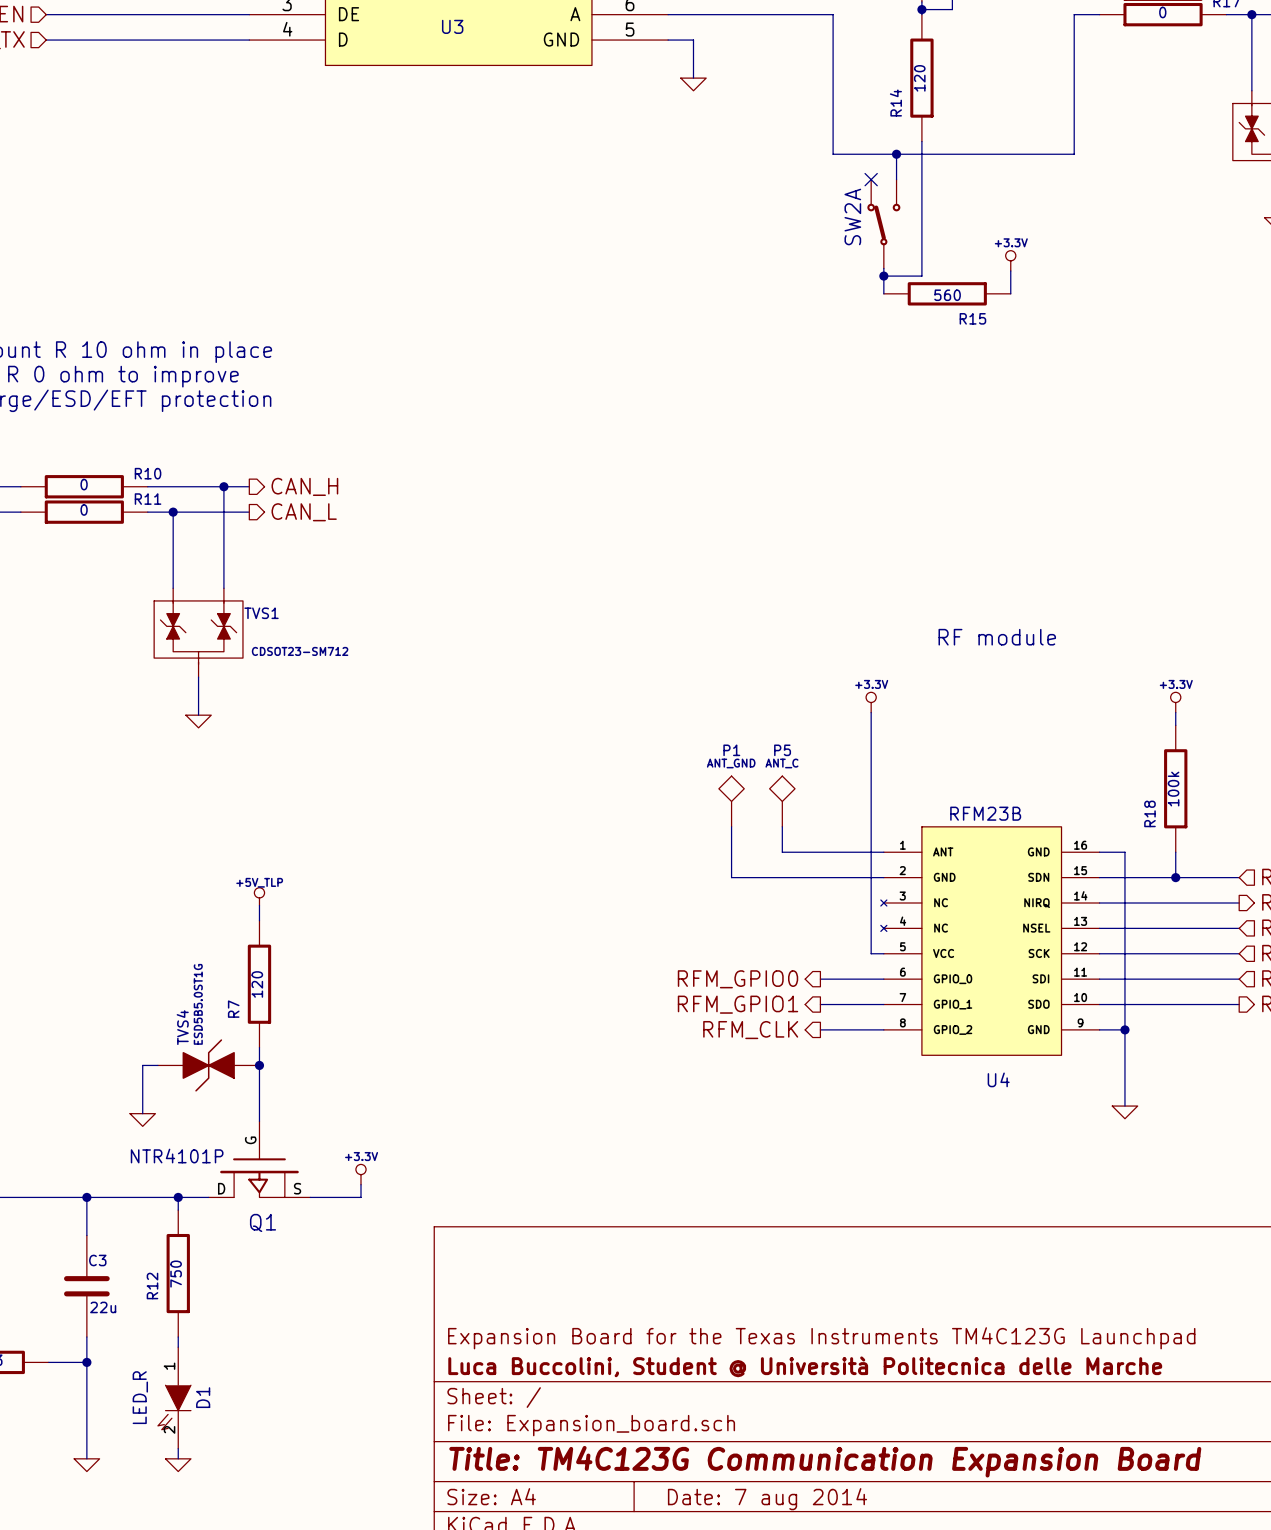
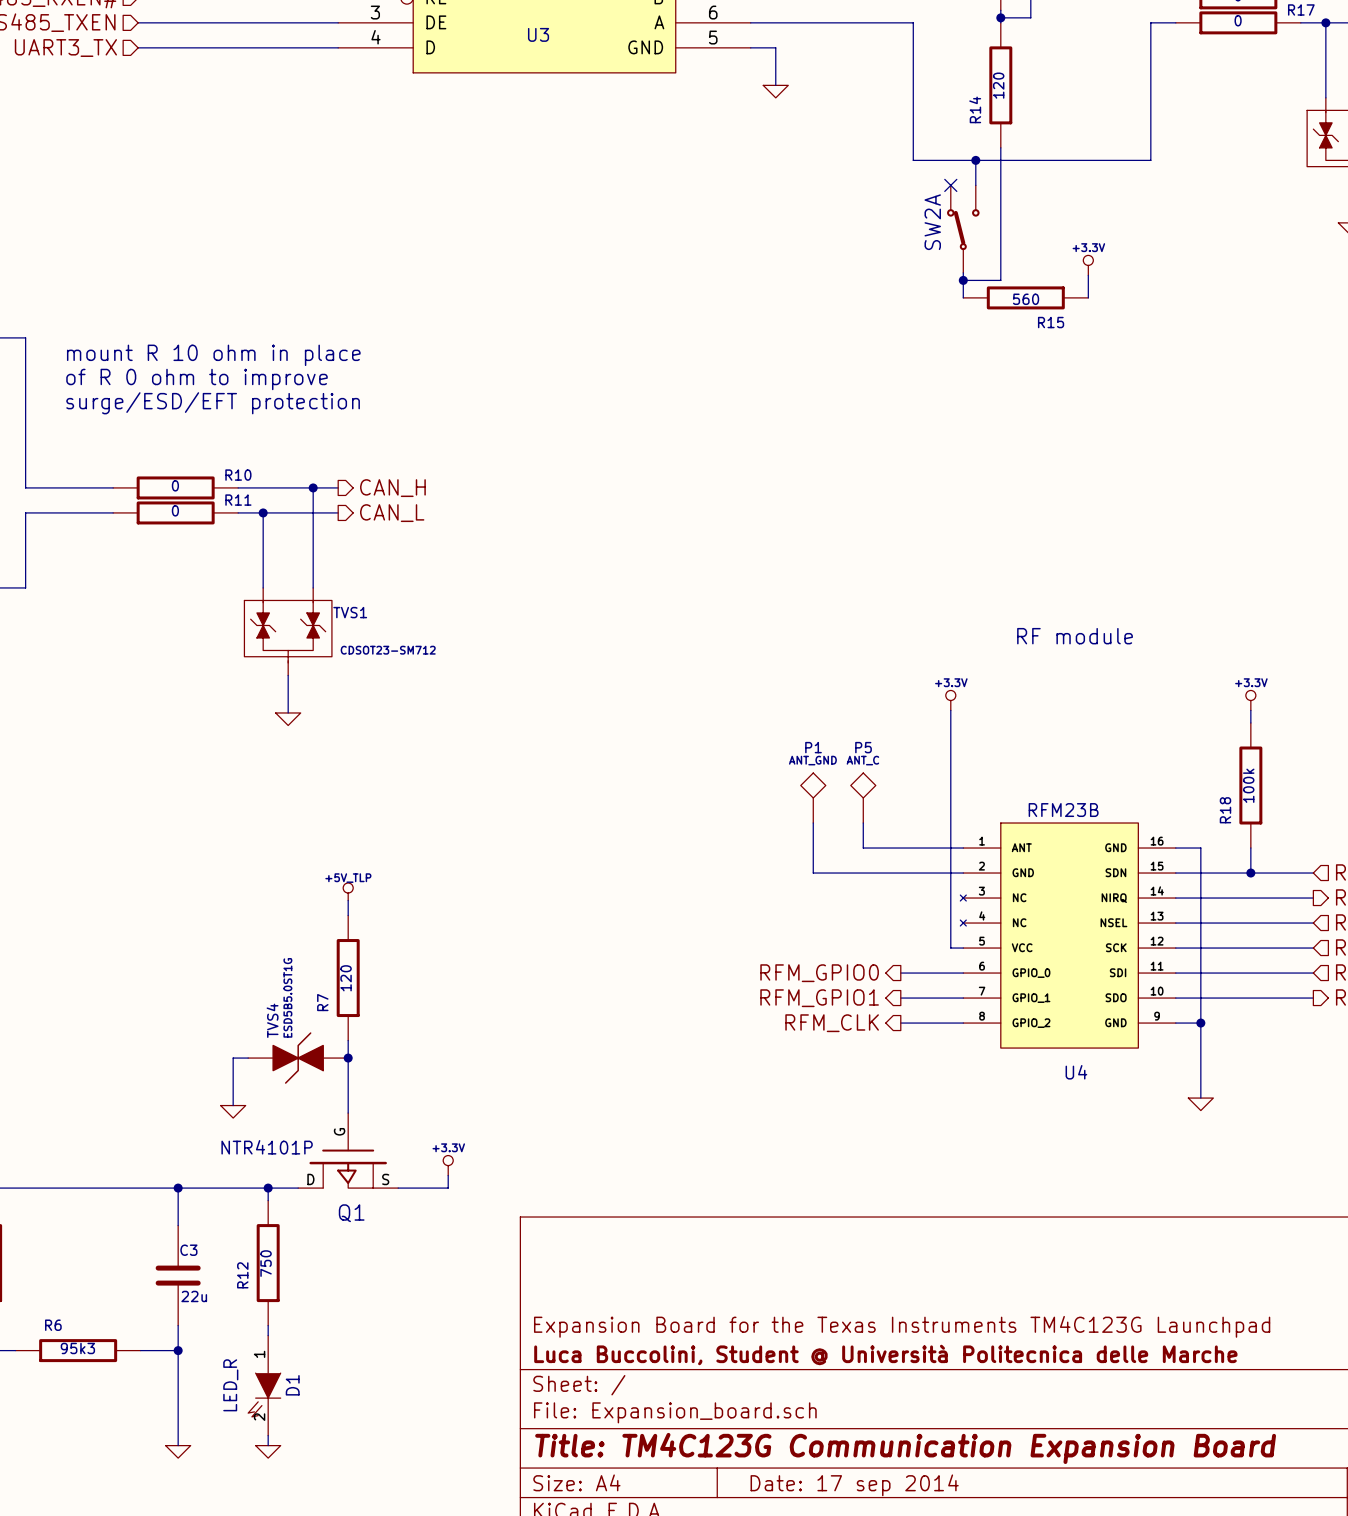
title block: Date: 7 aug 2014 (767, 1499) -> Date: 17 sep 2014 (854, 1485)

